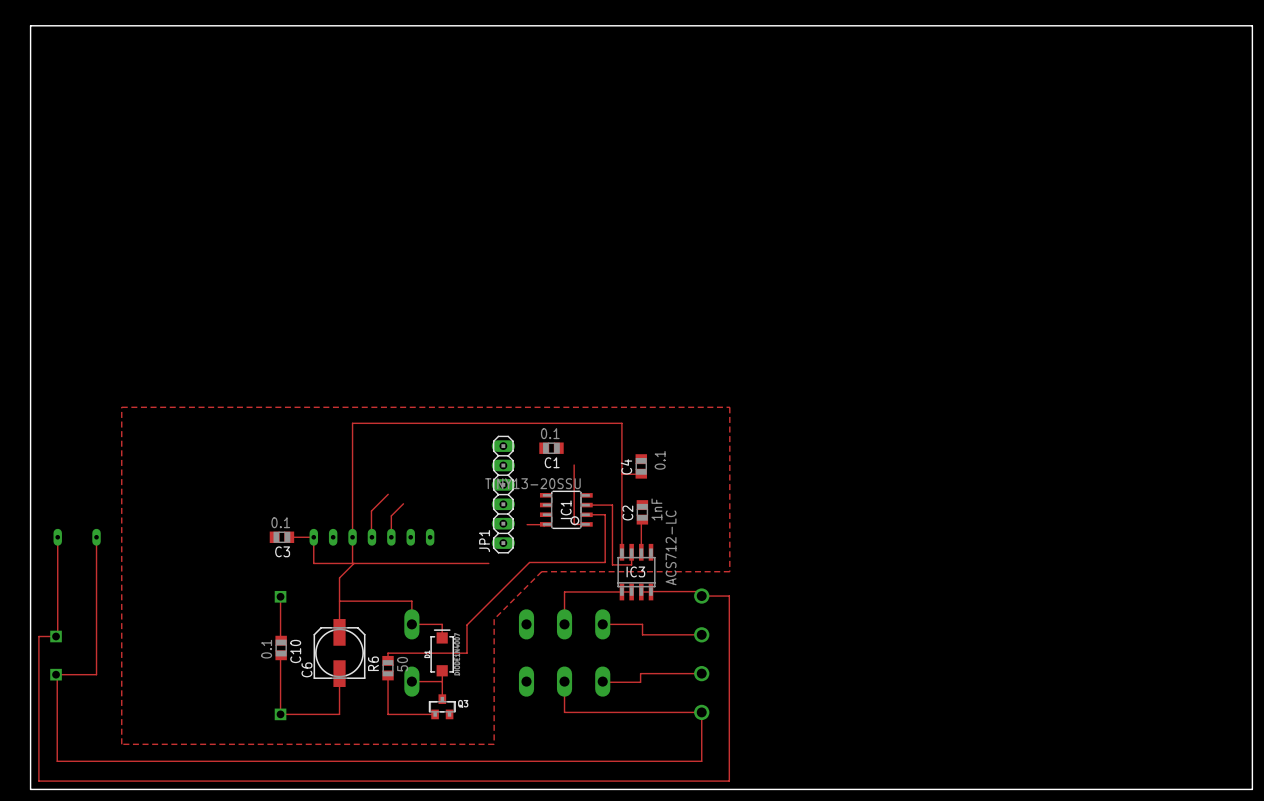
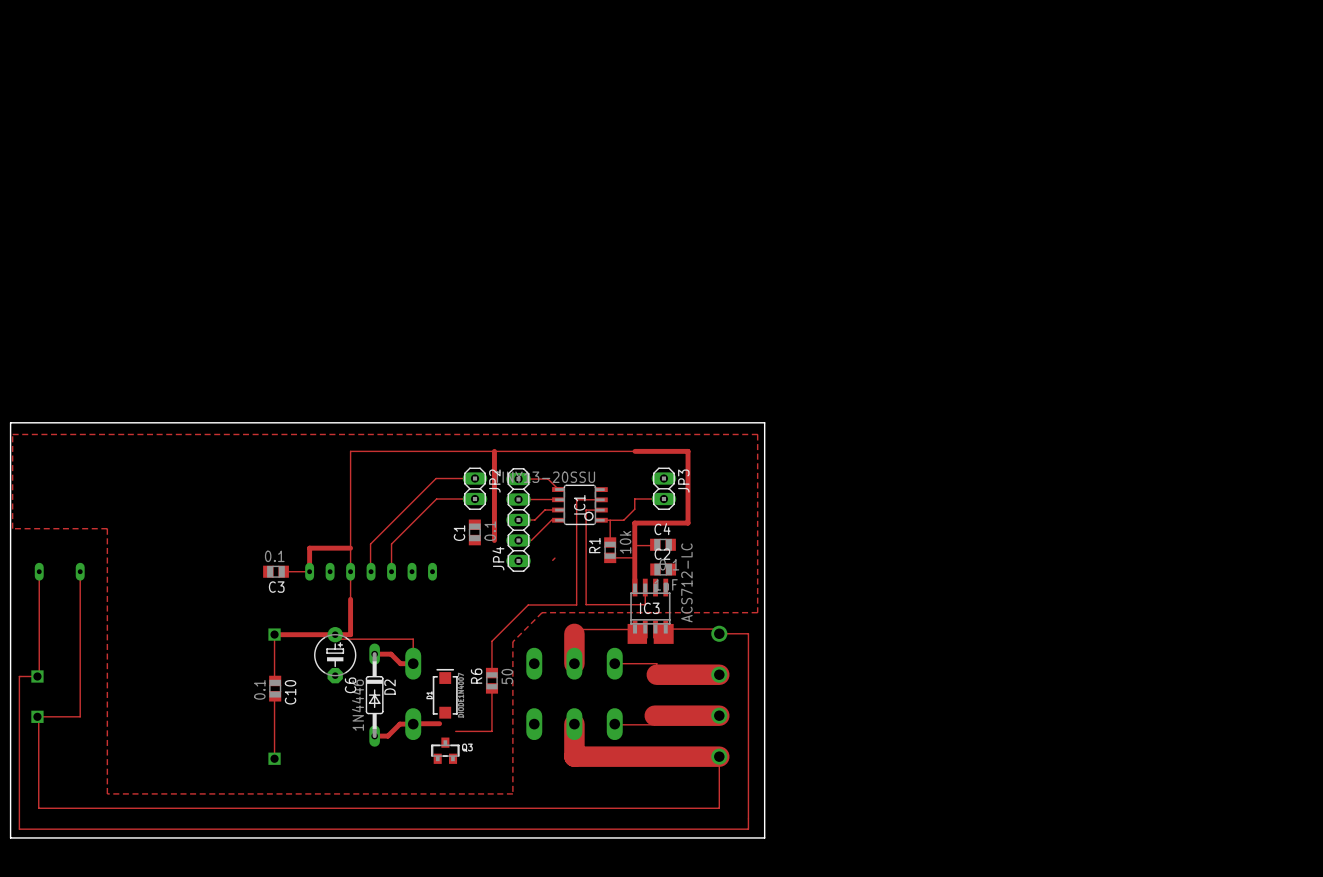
board edge: (30, 396) (30, 25) (1252, 25) (1252, 789) (744, 789) -> (10, 422) (764, 422) (764, 837)
top zone outline: (121, 407) (121, 744) (494, 744) (494, 619) (541, 571) (729, 571) (729, 407) -> (106, 434) (12, 434) (12, 528) (107, 528) (107, 793) (512, 793) (512, 641) (542, 612) (757, 612) (757, 434) (748, 434)
top track: none -> (494, 451) (494, 540)
top track: (621, 423) (620, 551) -> (635, 451) (688, 451) (688, 523) (634, 523) (634, 590)
C1 rotation: 0° (551, 448) -> 90° clockwise (474, 532)
C1 position: (551, 448) -> (474, 532)
top track: none -> (475, 478) (436, 478) (388, 526)
top track: none -> (518, 479) (548, 479) (558, 489)
JP2: none -> (475, 488)
JP3: none -> (663, 488)
top track: (574, 465) (574, 524) (586, 524) -> none
C4 rotation: 0° (641, 466) -> 90° clockwise (662, 544)
C4 position: (641, 466) -> (662, 544)
top track: none -> (518, 499) (558, 499)
top track: none -> (663, 499) (634, 499) (634, 509) (623, 520) (601, 519)
top track: none -> (601, 499) (576, 499) (576, 604) (528, 604) (491, 641) (491, 673)
top track: (641, 473) (621, 474) -> none
top track: none -> (558, 509) (544, 509) (534, 519) (518, 519)
JP4: none -> (518, 519)
top track: none -> (558, 520) (551, 520) (531, 540)
top track: none -> (610, 520) (610, 542)
JP1: (503, 494) -> none
top track: (403, 503) (391, 515) -> (475, 499) (436, 499) (391, 544) (391, 549)
top track: (586, 505) (612, 505) (612, 564) (631, 564) -> (601, 510) (586, 510) (586, 604) (645, 604) (645, 600)
IC1 position: (566, 509) -> (579, 504)
top track: none -> (655, 544) (634, 545)
C2 rotation: 0° (642, 512) -> 90° clockwise (663, 569)
C2 position: (642, 512) -> (663, 569)
top track: (586, 514) (605, 514) (605, 562) (529, 562) (466, 625) (466, 653) (388, 653) (387, 660) -> none
R1: none -> 10k (610, 550)
top track: (642, 519) (641, 552) -> none
top track: (527, 524) (545, 525) -> none
top track: none -> (610, 557) (634, 558)
top track: (313, 537) (313, 563) (488, 563) -> (309, 571) (309, 548) (350, 548)
top track: none -> (350, 599) (350, 634) (274, 634)
top track: (354, 563) (339, 577) (339, 632) -> none
drawing: none -> [627, 623, 674, 644]
top track width: thin (564, 596) (564, 624) -> thick (574, 633) (574, 663)
C6 footprint: [313, 619, 366, 687] -> [314, 627, 357, 684]
top track: (411, 624) (442, 624) (442, 637) -> (413, 663) (400, 663) (391, 654) (374, 654)
top track width: thin (642, 634) (701, 634) -> thick (656, 674) (719, 674)
top track: none -> (491, 688) (491, 731) (455, 731)
D2: none -> 1N4446 (374, 695)
R6 position: (388, 668) -> (491, 680)
C6 name position: C6 (306, 669) -> C6 (350, 685)
top track: (442, 670) (442, 699) -> none
top track: (339, 673) (339, 714) (280, 714) -> none
top track width: thin (640, 673) (701, 673) -> thick (654, 715) (719, 715)
top track: (388, 675) (388, 714) (435, 714) -> none
top track: (411, 681) (442, 681) -> none
top track: none -> (439, 723) (399, 724) (387, 736) (374, 736)
top track width: thin (564, 681) (564, 712) (701, 712) -> thick (574, 724) (574, 756) (719, 756)

